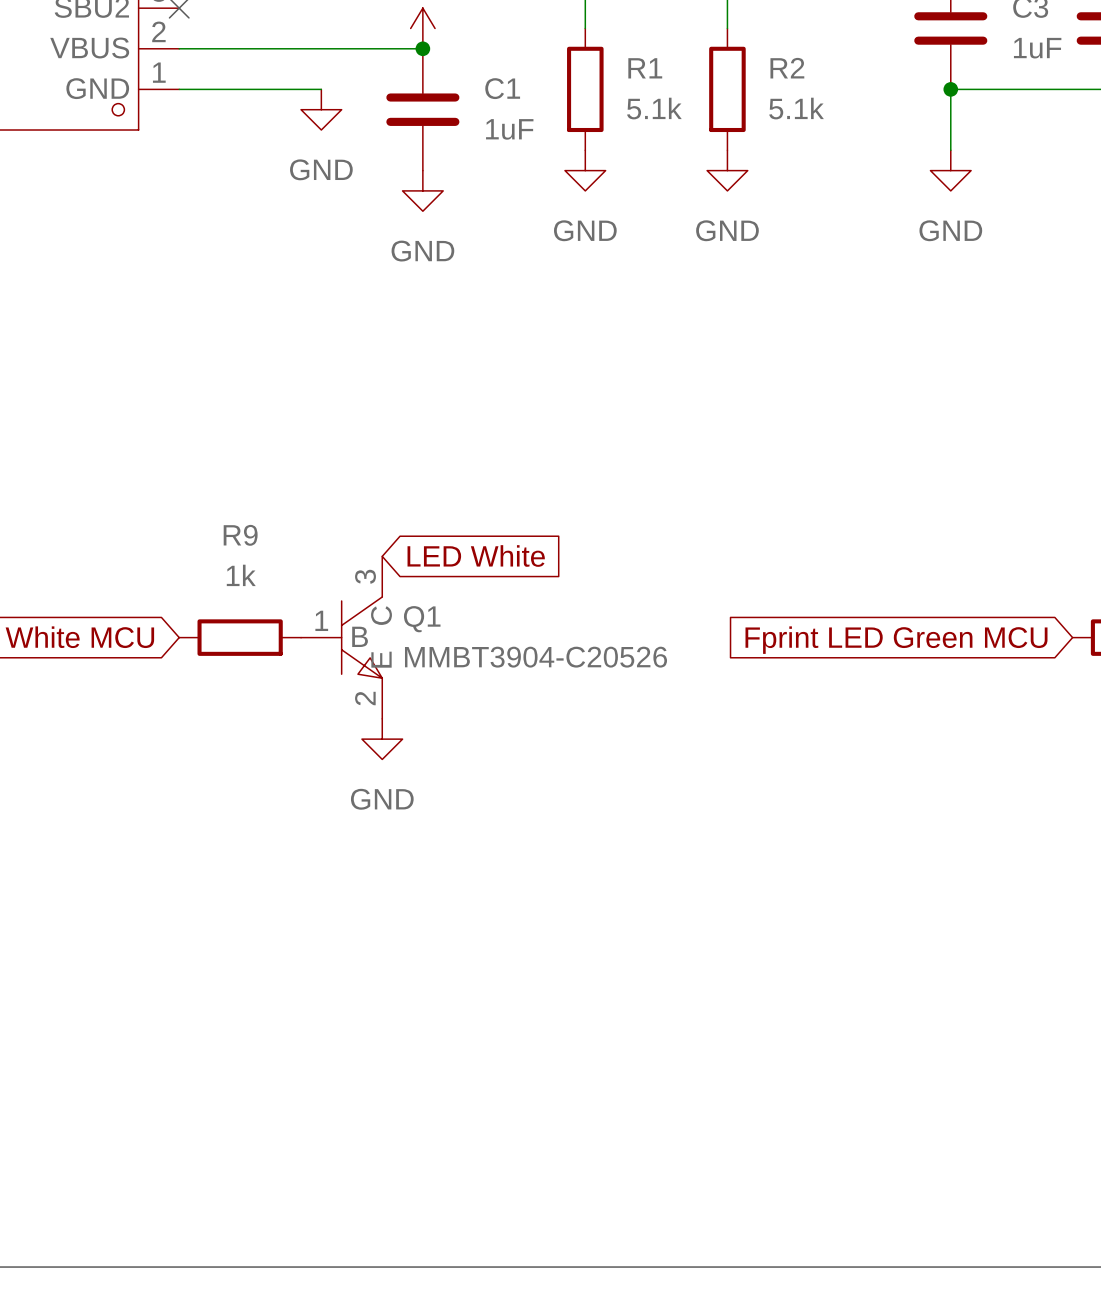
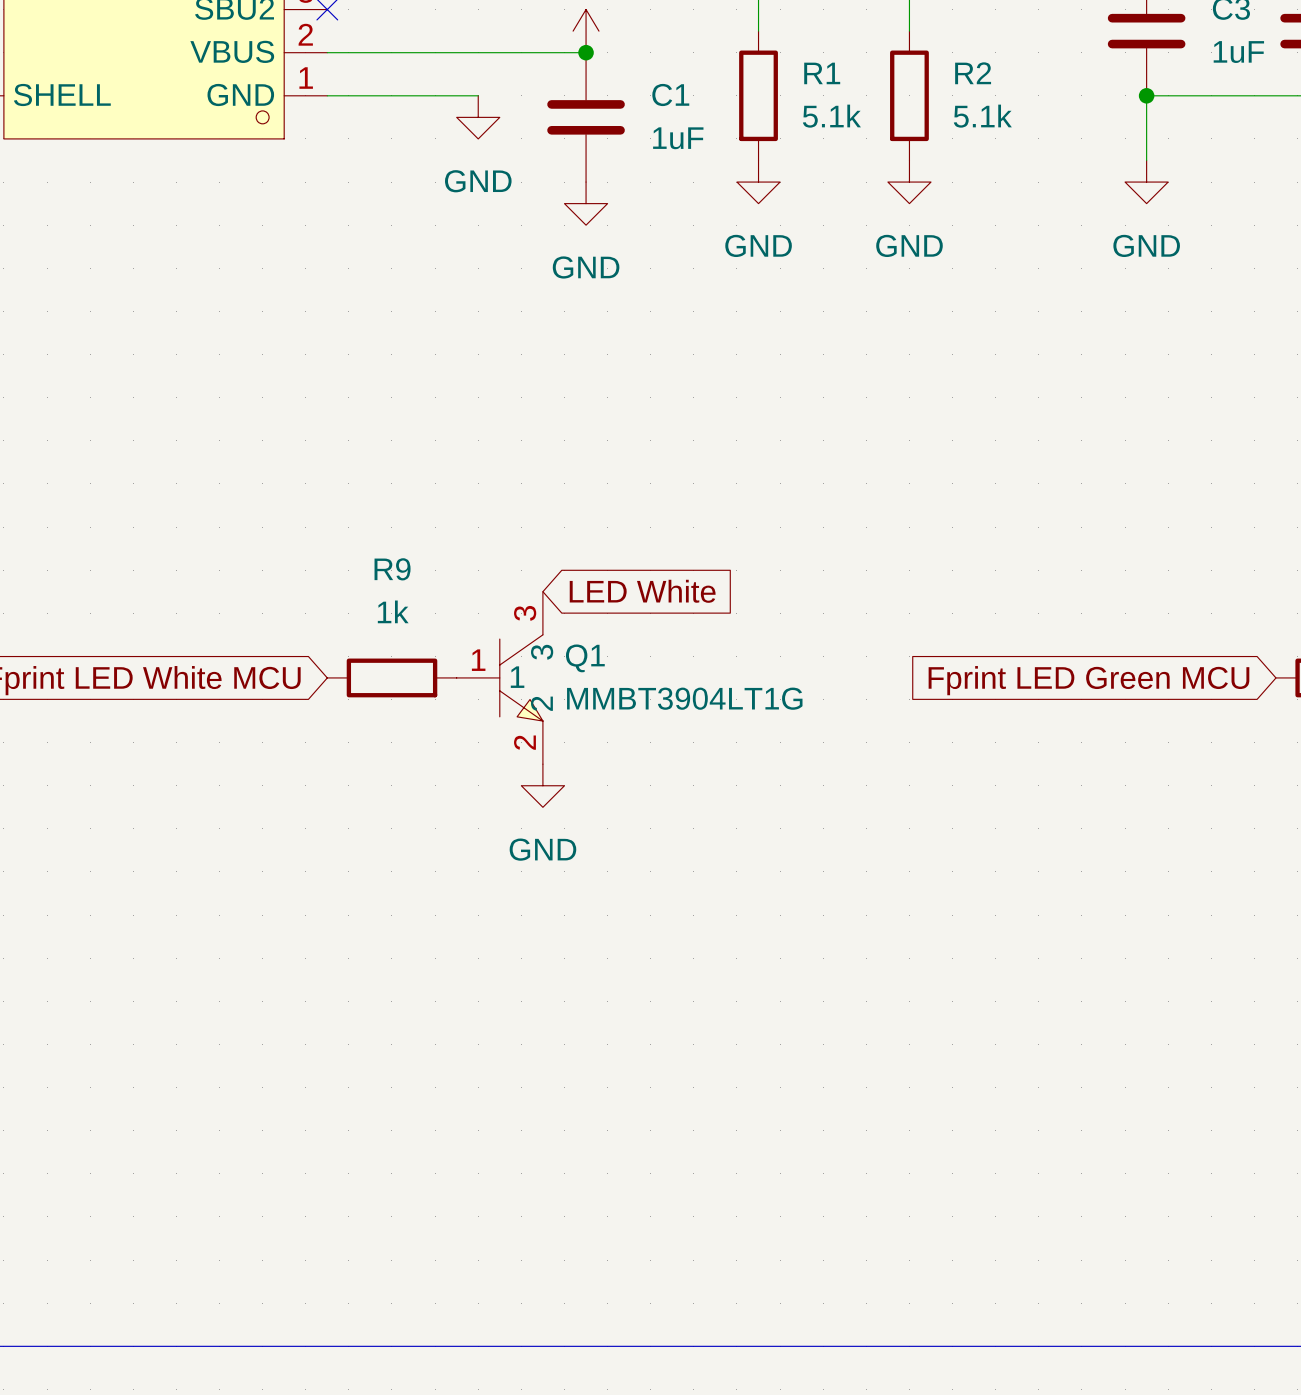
Q1 pin name: C (381, 615) -> 3 (542, 652)
Q1 pin name: B (360, 636) -> 1 (517, 677)
Q1 value: MMBT3904-C20526 (536, 657) -> MMBT3904LT1G (684, 698)
Q1 pin name: E (381, 659) -> 2 (541, 703)

